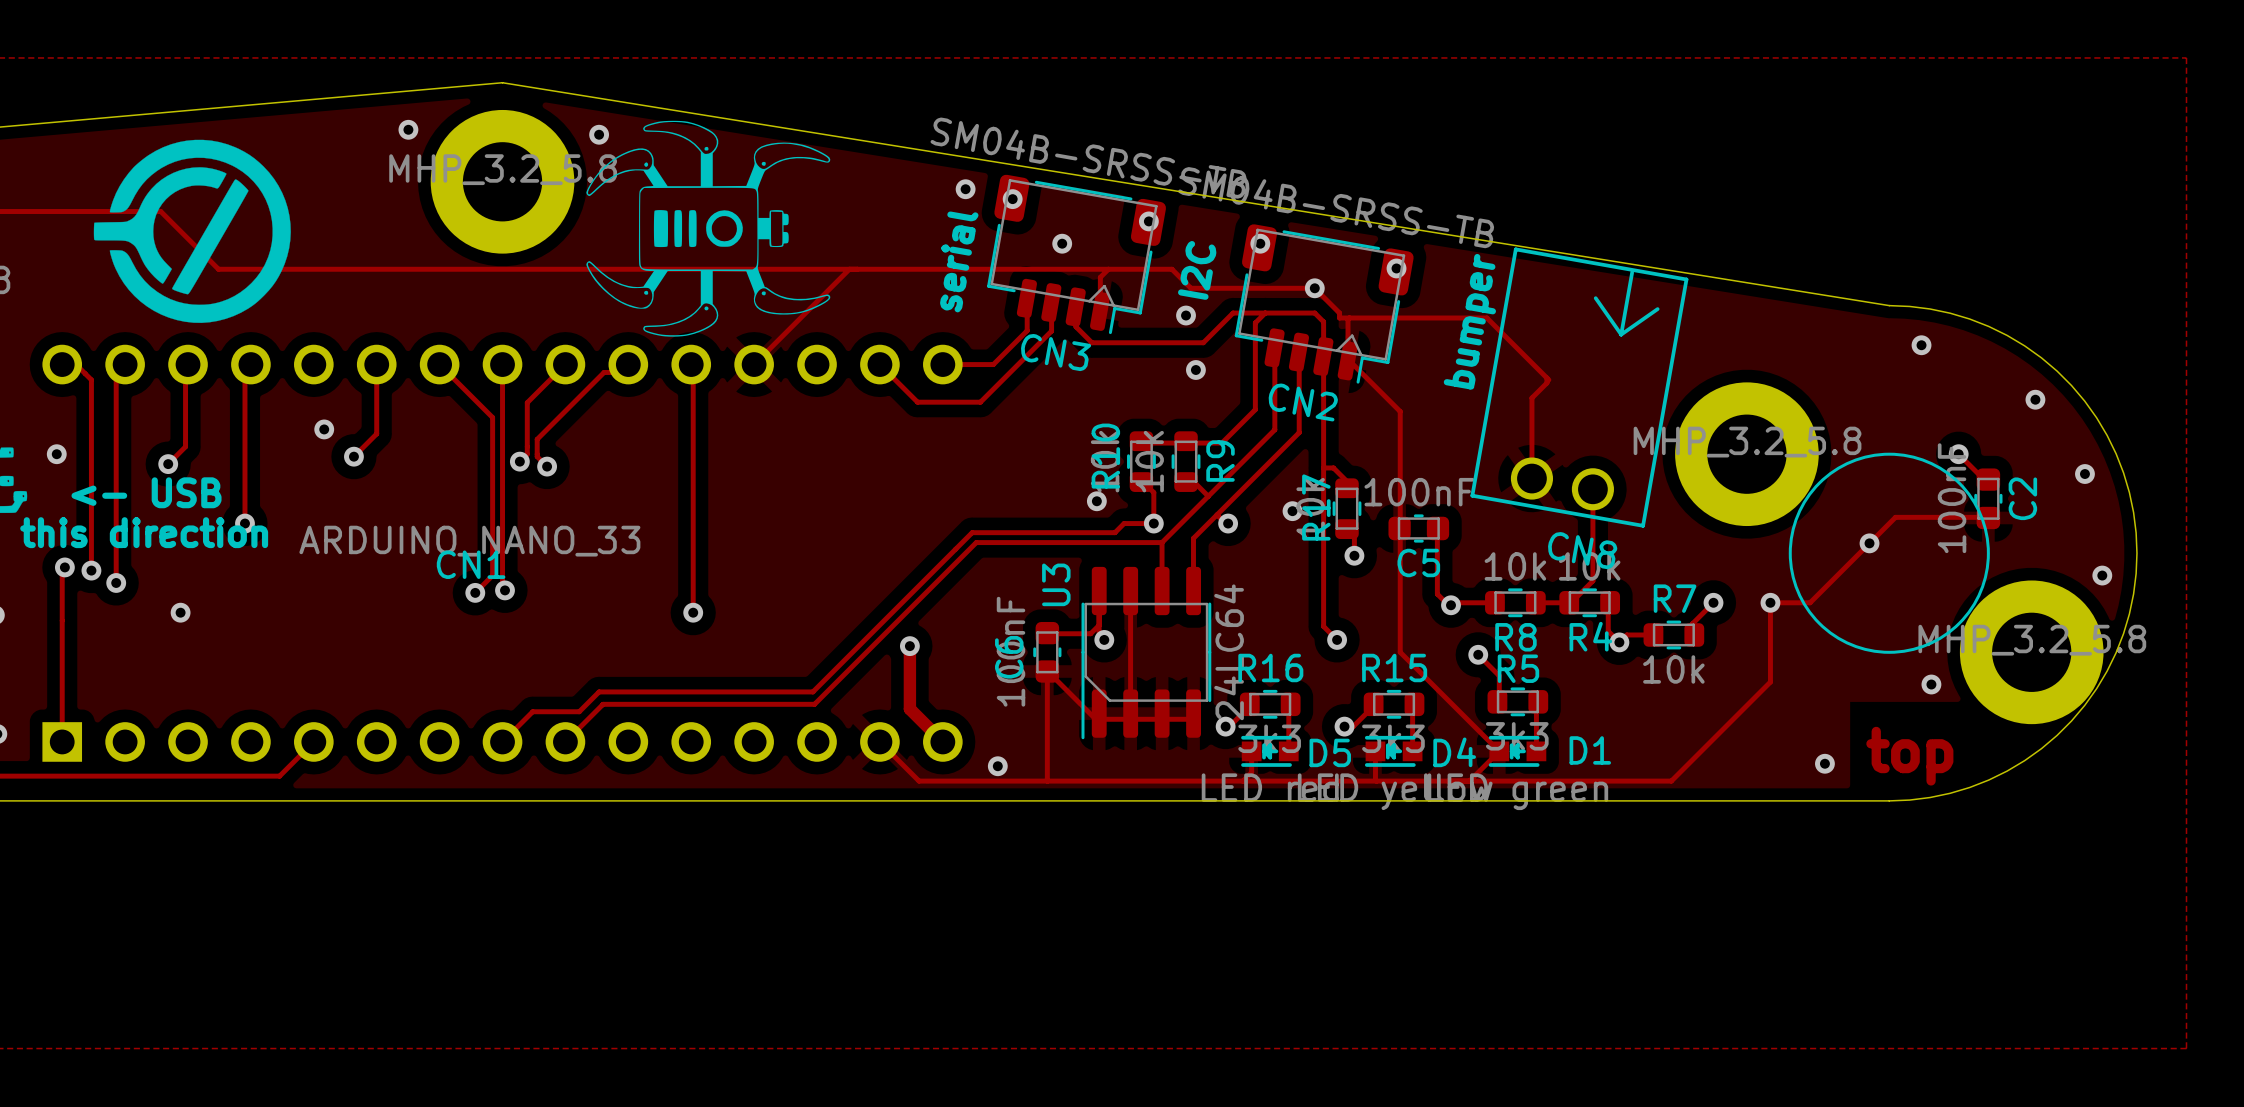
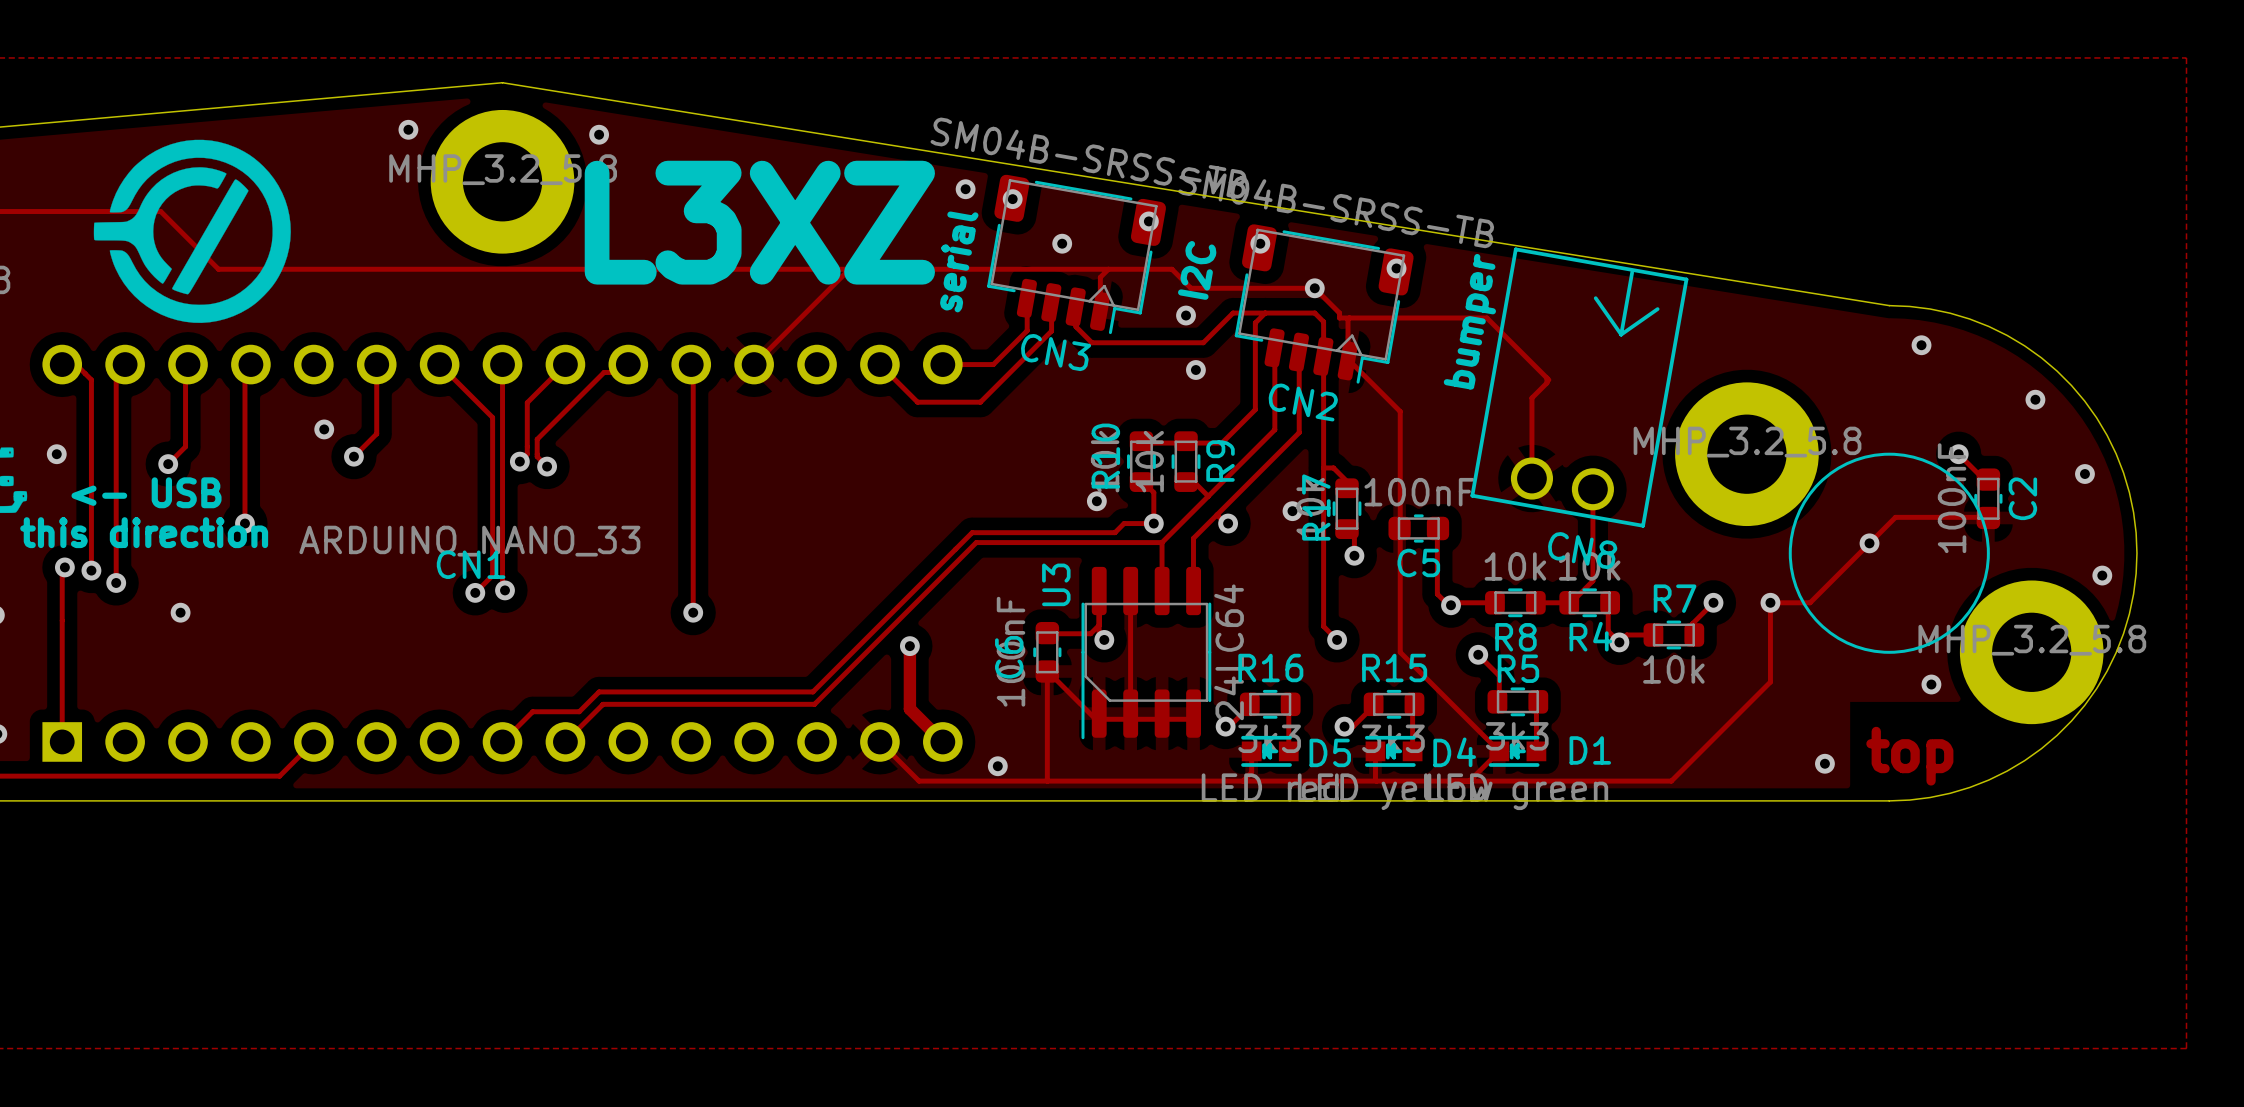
drawing: [586, 120, 831, 337] -> none
text: none -> L3XZ (759, 222)

